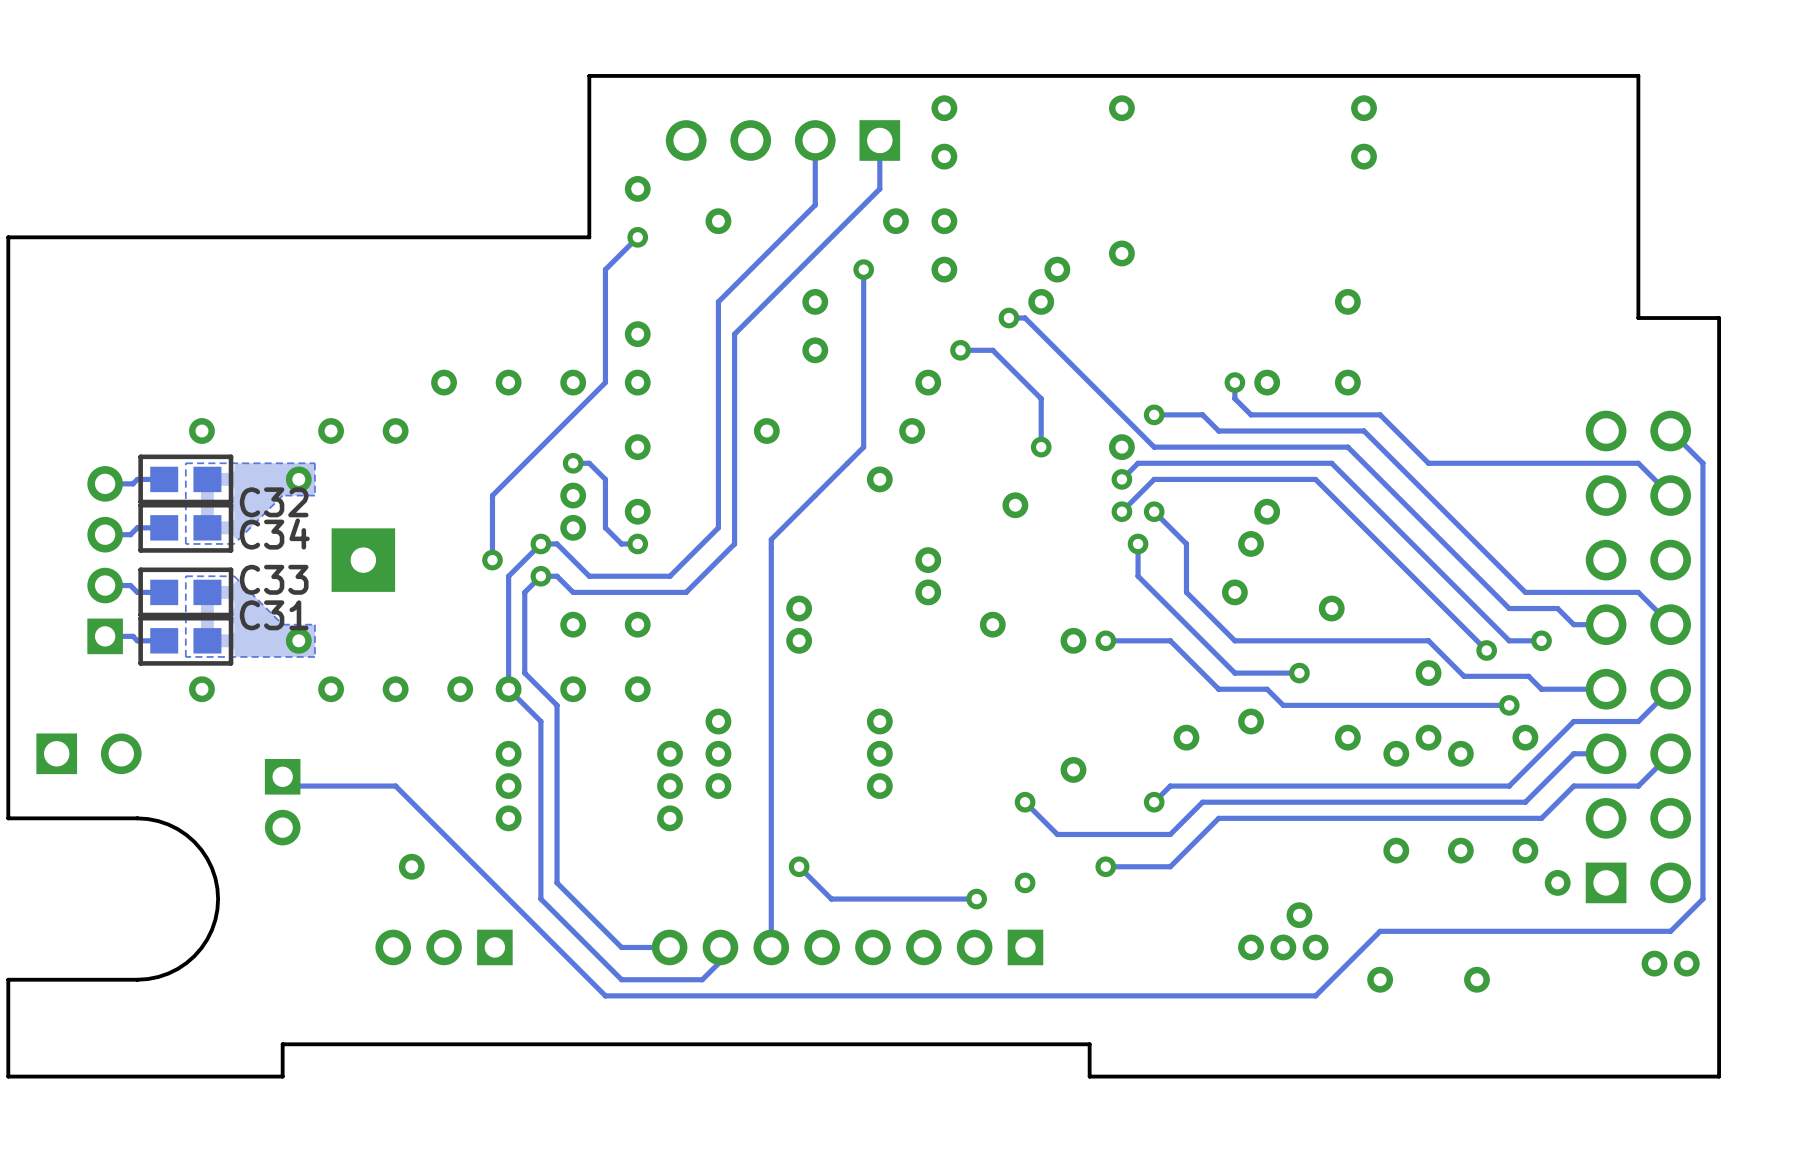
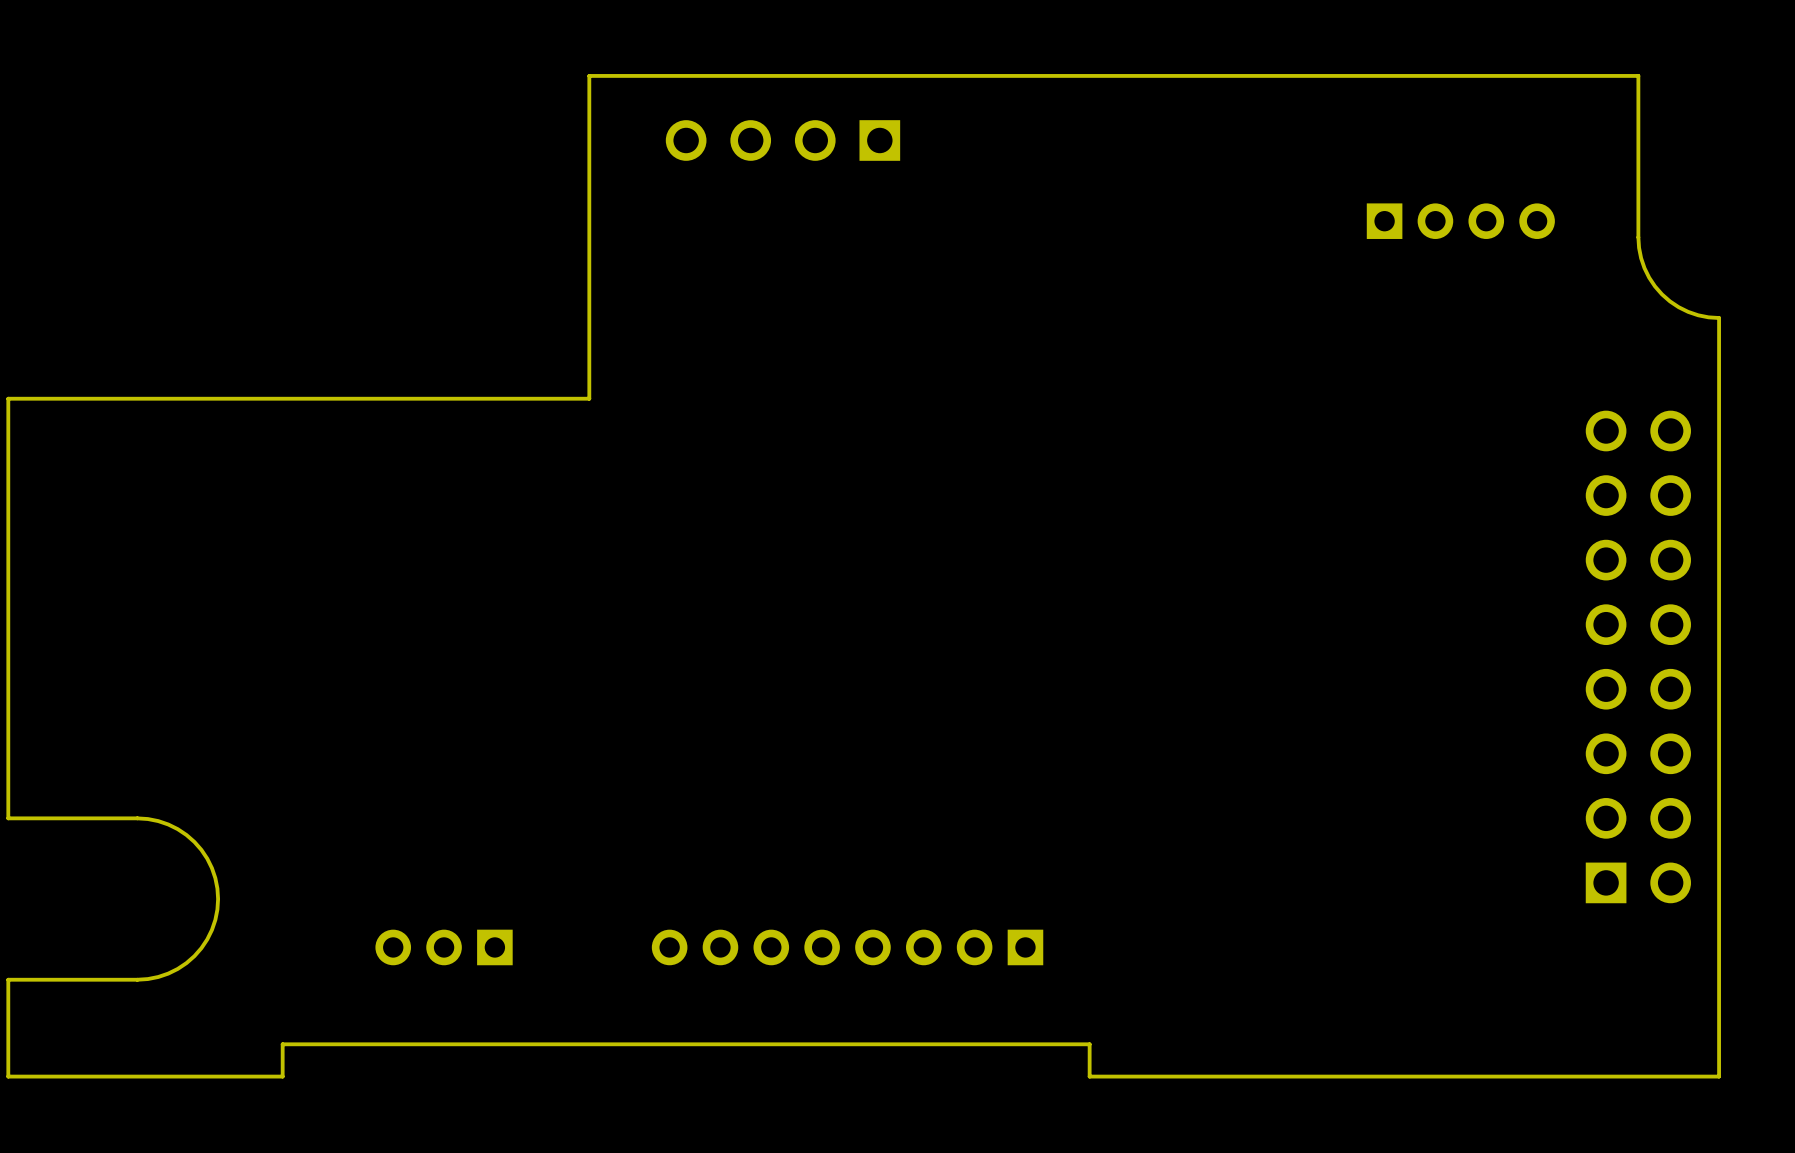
via: (944, 108) -> none
via: (1121, 108) -> none
via: (1364, 108) -> none
track: (815, 140) (815, 205) (718, 301) (718, 527) (670, 576) (589, 576) (557, 543) (540, 543) (508, 576) (508, 689) (540, 721) (540, 899) (621, 979) (702, 979) (720, 961) (720, 947) -> none
track: (879, 140) (879, 188) (734, 334) (734, 543) (686, 592) (573, 592) (557, 576) (540, 576) (524, 592) (524, 673) (557, 705) (557, 882) (621, 947) (669, 947) -> none
via: (944, 156) -> none
via: (1364, 156) -> none
via: (637, 188) -> none
via: (718, 221) -> none
via: (895, 221) -> none
via: (944, 221) -> none
part: none -> (1460, 221)
board edge: (589, 237) (8, 237) (8, 398) -> (589, 237) (589, 398) (8, 398)
track: (637, 237) (605, 269) (605, 382) (492, 495) (492, 560) -> none
via: (637, 237) -> none
board edge: (1638, 237) (1638, 318) (1719, 318) -> (1638, 237) (1644, 268) (1662, 294) (1688, 311) (1719, 318)
via: (1121, 253) -> none
track: (863, 269) (863, 447) (771, 539) (771, 947) -> none
via: (863, 269) -> none
via: (944, 269) -> none
via: (1057, 269) -> none
via: (815, 301) -> none
via: (1041, 301) -> none
via: (1347, 301) -> none
track: (1008, 318) (1025, 318) (1154, 447) (1347, 447) (1509, 608) (1557, 608) (1573, 624) (1606, 624) -> none
via: (1008, 318) -> none
via: (637, 334) -> none
via: (815, 350) -> none
track: (960, 350) (992, 350) (1041, 398) (1041, 447) -> none
via: (960, 350) -> none
via: (444, 382) -> none
via: (508, 382) -> none
via: (573, 382) -> none
via: (637, 382) -> none
via: (928, 382) -> none
track: (1234, 382) (1234, 398) (1251, 414) (1380, 414) (1428, 463) (1638, 463) (1670, 495) -> none
via: (1234, 382) -> none
via: (1267, 382) -> none
via: (1347, 382) -> none
track: (1154, 414) (1202, 414) (1218, 431) (1364, 431) (1525, 592) (1638, 592) (1670, 624) -> none
via: (1154, 414) -> none
via: (201, 431) -> none
via: (331, 431) -> none
via: (395, 431) -> none
via: (766, 431) -> none
via: (912, 431) -> none
track: (1670, 431) (1702, 463) (1702, 899) (1670, 931) (1380, 931) (1315, 995) (605, 995) (395, 786) (282, 786) -> none
via: (637, 447) -> none
via: (1041, 447) -> none
via: (1121, 447) -> none
zone outline: (314, 463) (185, 463) (185, 543) (234, 543) (282, 495) (314, 495) (314, 463) -> none
track: (573, 463) (589, 463) (605, 479) (605, 527) (621, 543) (637, 543) -> none
via: (573, 463) -> none
track: (164, 479) (137, 479) (132, 483) (105, 483) -> none
C32: (185, 479) -> none
via: (298, 479) -> none
via: (879, 479) -> none
track: (1121, 479) (1138, 463) (1331, 463) (1509, 640) (1541, 640) -> none
via: (1121, 479) -> none
via: (573, 495) -> none
via: (1015, 505) -> none
via: (637, 511) -> none
track: (1121, 511) (1154, 479) (1315, 479) (1486, 650) -> none
via: (1121, 511) -> none
track: (1154, 511) (1186, 543) (1186, 592) (1234, 640) (1428, 640) (1464, 676) (1528, 676) (1541, 689) (1606, 689) -> none
via: (1154, 511) -> none
via: (1267, 511) -> none
track: (164, 527) (137, 527) (130, 534) (105, 534) -> none
C34: (185, 527) -> none
via: (573, 527) -> none
via: (540, 543) -> none
via: (637, 543) -> none
track: (1138, 543) (1138, 576) (1234, 673) (1299, 673) -> none
via: (1138, 543) -> none
via: (1251, 543) -> none
part: (105, 560) -> none
part: (363, 560) -> none
via: (492, 560) -> none
via: (928, 560) -> none
zone outline: (234, 576) (185, 576) (185, 656) (314, 656) (314, 624) (282, 624) (234, 576) -> none
via: (540, 576) -> none
track: (105, 585) (130, 585) (137, 592) (164, 592) -> none
C33: (185, 592) -> none
via: (928, 592) -> none
via: (1234, 592) -> none
via: (799, 608) -> none
via: (1331, 608) -> none
via: (573, 624) -> none
via: (637, 624) -> none
via: (992, 624) -> none
track: (105, 636) (132, 636) (137, 640) (164, 640) -> none
C31: (185, 640) -> none
via: (298, 640) -> none
via: (799, 640) -> none
via: (1073, 640) -> none
track: (1105, 640) (1170, 640) (1218, 689) (1267, 689) (1283, 705) (1509, 705) -> none
via: (1105, 640) -> none
via: (1541, 640) -> none
via: (1486, 650) -> none
via: (1299, 673) -> none
via: (1428, 673) -> none
via: (201, 689) -> none
via: (331, 689) -> none
via: (395, 689) -> none
via: (460, 689) -> none
via: (508, 689) -> none
via: (573, 689) -> none
via: (637, 689) -> none
track: (1670, 689) (1638, 721) (1573, 721) (1509, 786) (1170, 786) (1154, 802) -> none
via: (1509, 705) -> none
via: (718, 721) -> none
via: (879, 721) -> none
via: (1251, 721) -> none
via: (1186, 737) -> none
via: (1347, 737) -> none
via: (1428, 737) -> none
via: (1525, 737) -> none
part: (88, 753) -> none
via: (508, 753) -> none
via: (670, 753) -> none
via: (718, 753) -> none
via: (879, 753) -> none
via: (1396, 753) -> none
via: (1460, 753) -> none
track: (1606, 753) (1573, 753) (1525, 802) (1202, 802) (1170, 834) (1057, 834) (1025, 802) -> none
track: (1670, 753) (1638, 786) (1573, 786) (1541, 818) (1218, 818) (1170, 866) (1105, 866) -> none
via: (1073, 769) -> none
via: (508, 786) -> none
via: (670, 786) -> none
via: (718, 786) -> none
via: (879, 786) -> none
part: (282, 802) -> none
via: (1025, 802) -> none
via: (1154, 802) -> none
via: (508, 818) -> none
via: (670, 818) -> none
via: (1396, 850) -> none
via: (1460, 850) -> none
via: (1525, 850) -> none
via: (411, 866) -> none
track: (799, 866) (831, 899) (976, 899) -> none
via: (799, 866) -> none
via: (1105, 866) -> none
via: (1025, 882) -> none
via: (1557, 882) -> none
via: (976, 899) -> none
via: (1299, 915) -> none
via: (1251, 947) -> none
via: (1283, 947) -> none
via: (1315, 947) -> none
via: (1654, 963) -> none
via: (1686, 963) -> none
via: (1380, 979) -> none
via: (1476, 979) -> none

